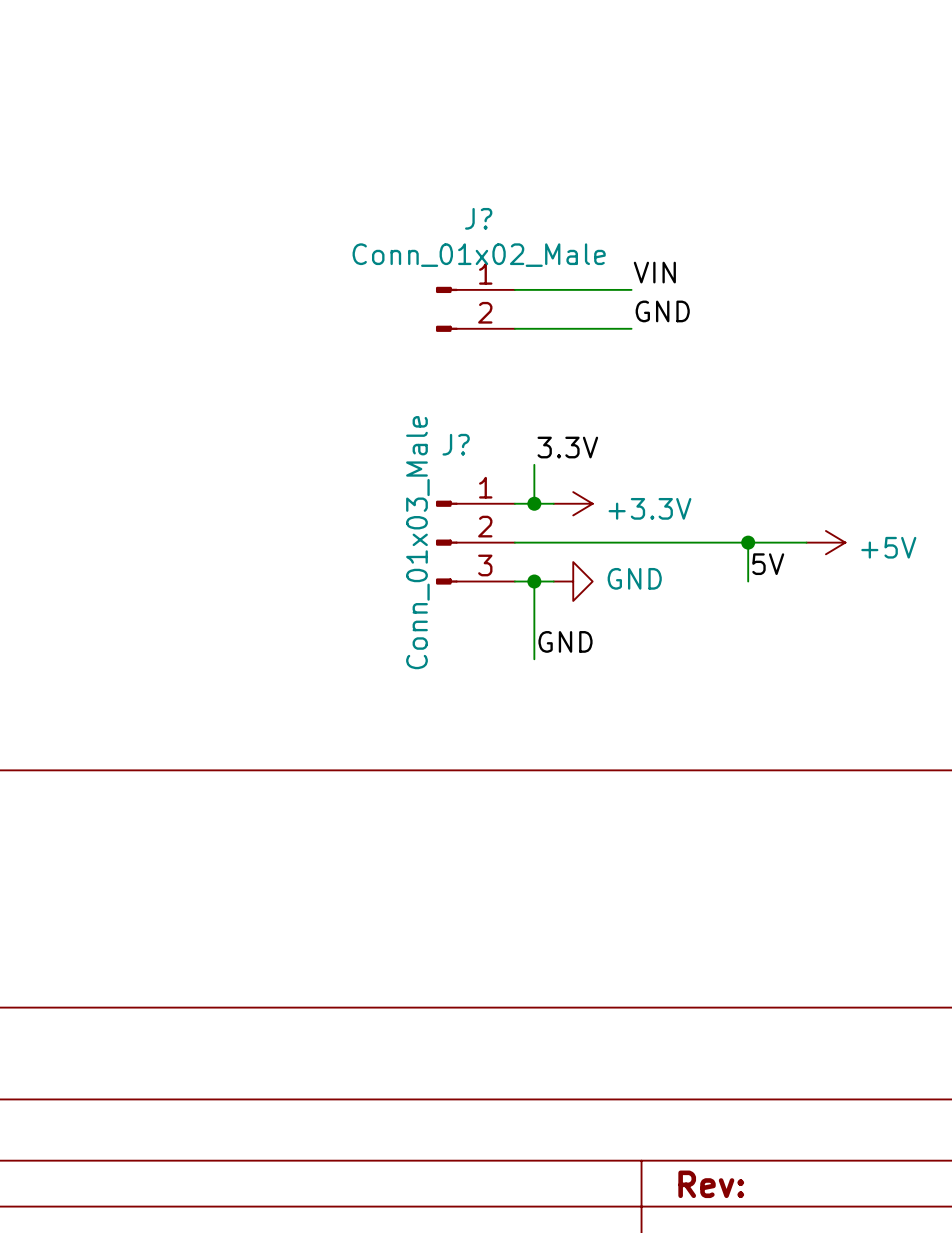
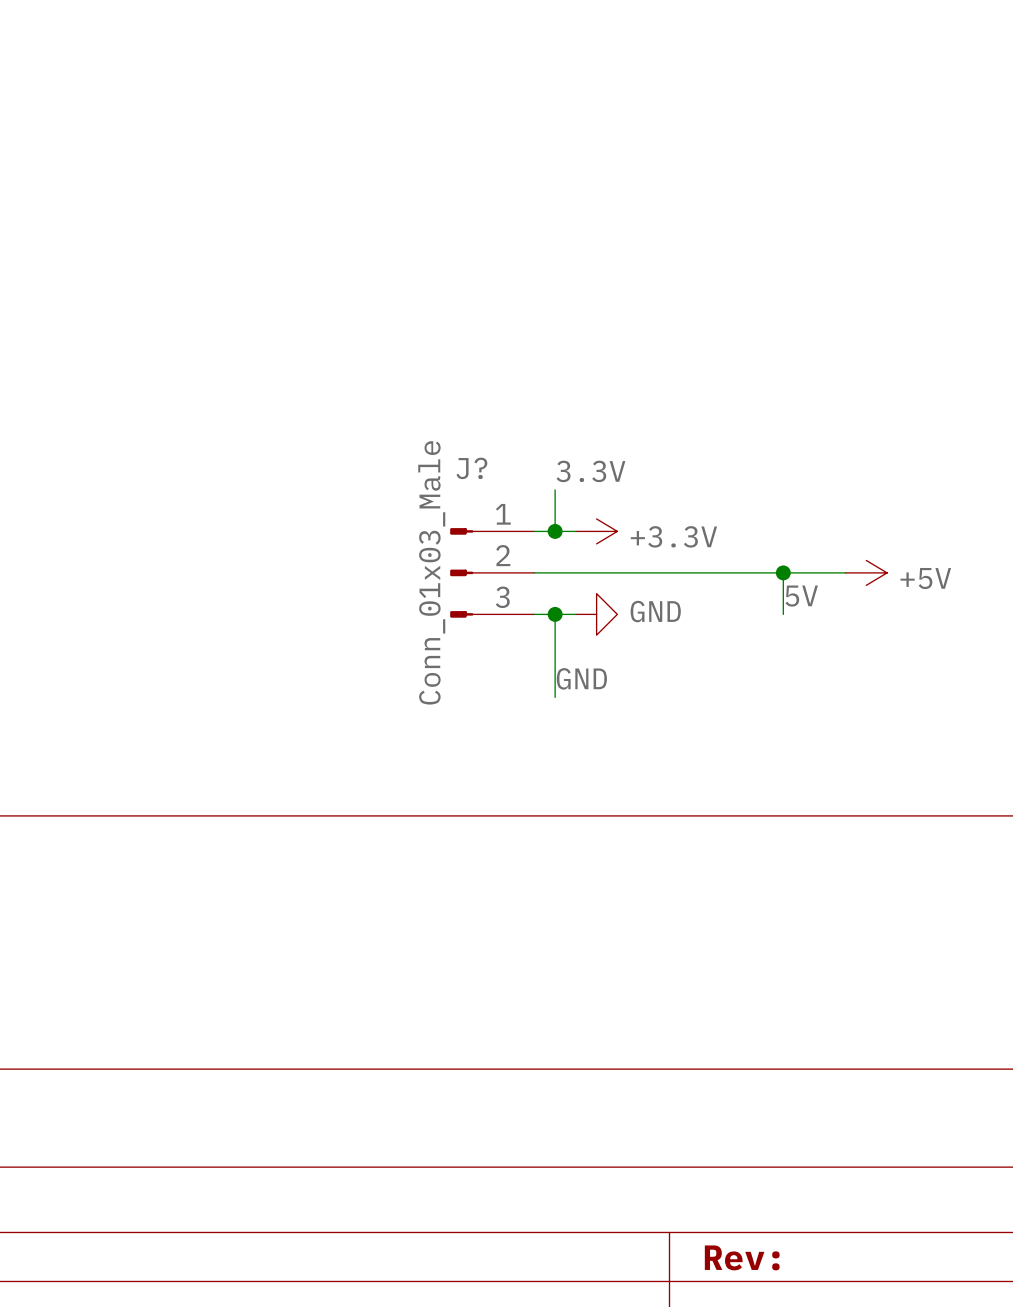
label: VIN (654, 272) -> none
wire: (514, 289) (631, 289) -> none
J?: Conn_01x02_Male (475, 309) -> none
label: GND (662, 311) -> none
wire: (514, 328) (631, 328) -> none

